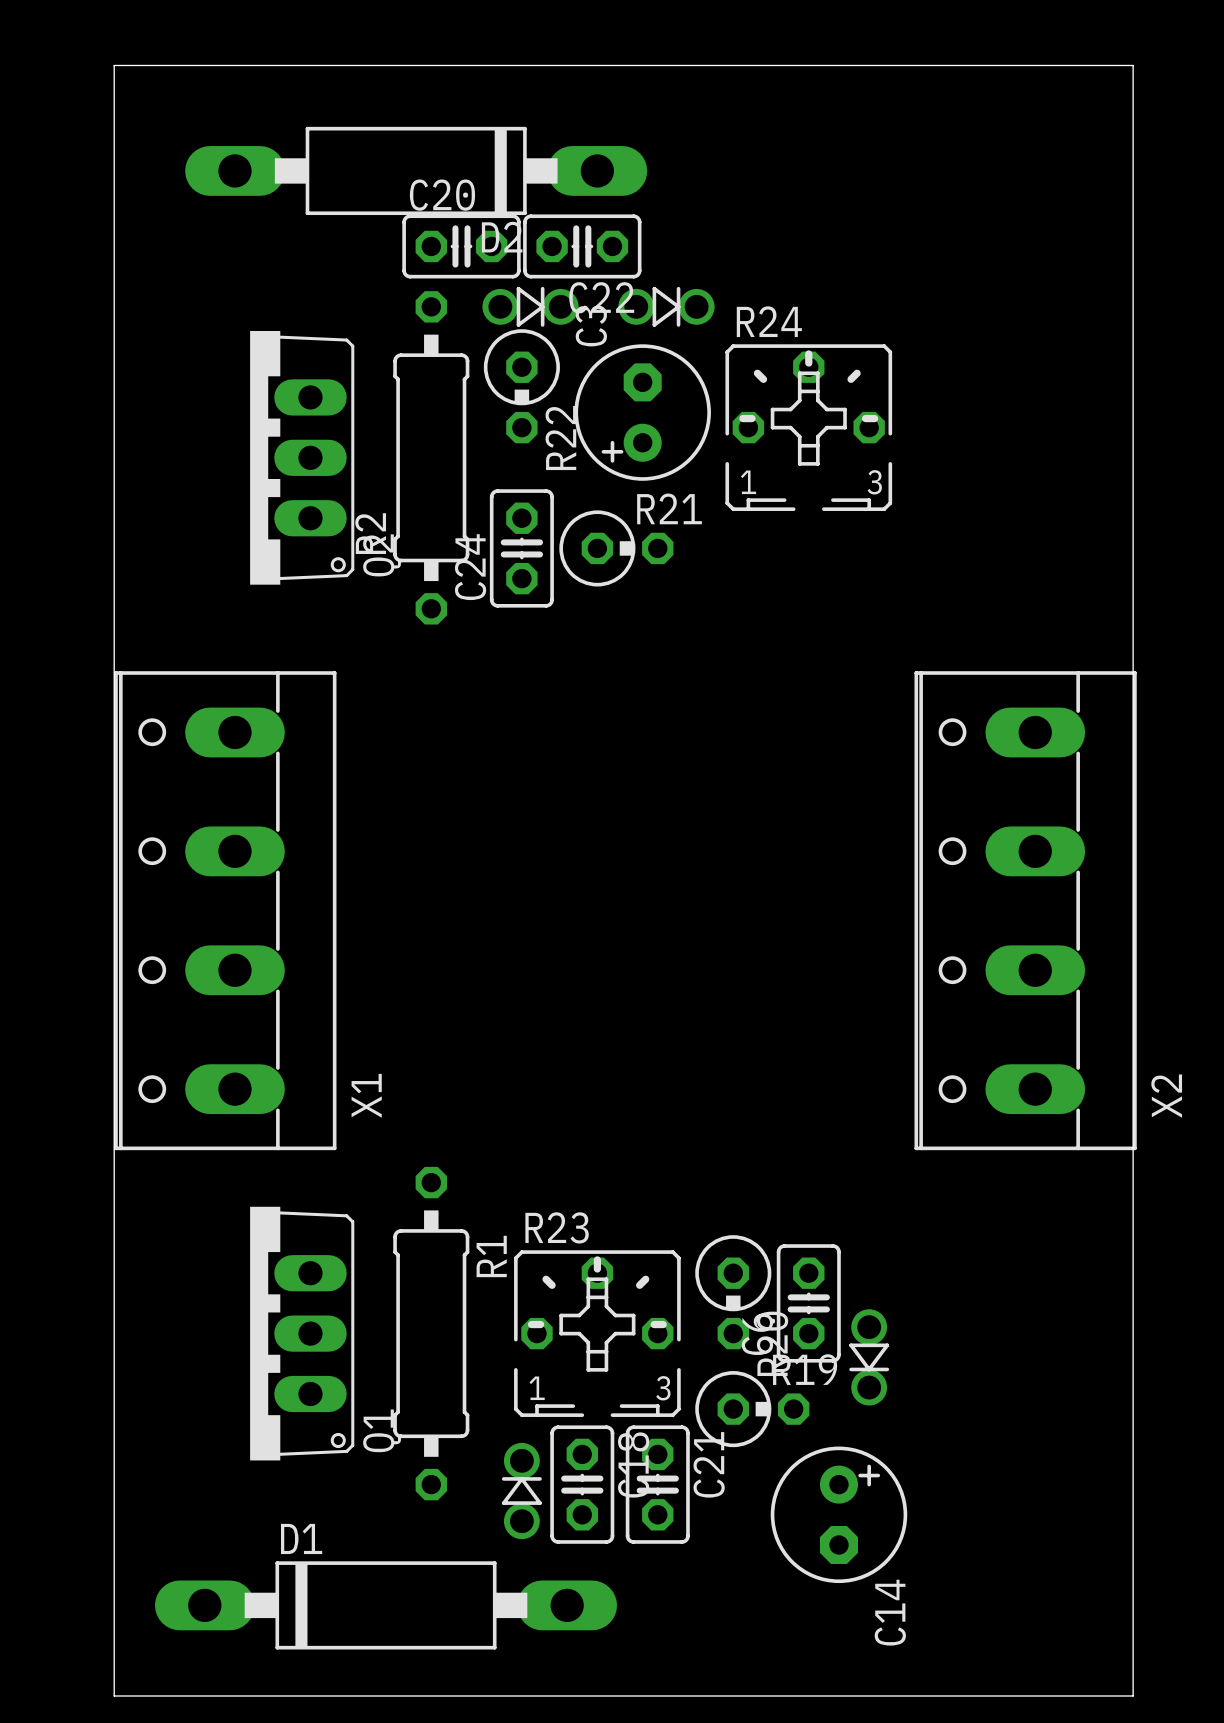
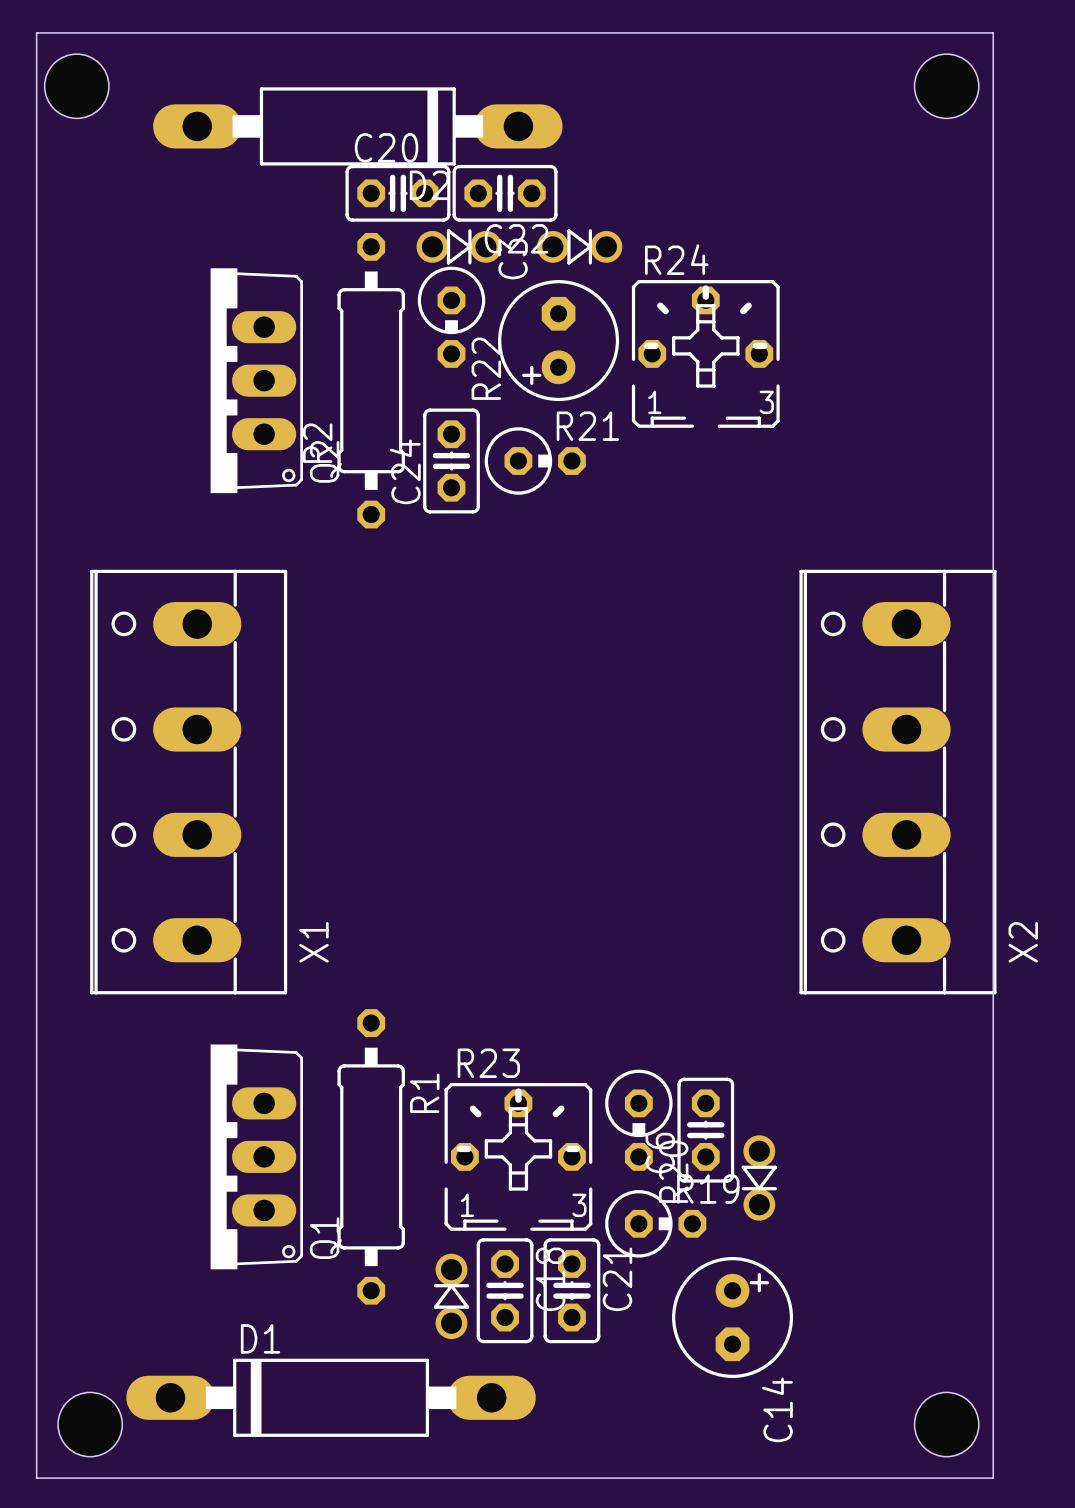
board edge: (114, 65) (114, 1696) -> (90, 32) (36, 32) (36, 1478) (90, 1478)
hole: none -> (76, 86)
hole: none -> (946, 86)
hole: none -> (90, 1424)
hole: none -> (946, 1424)

